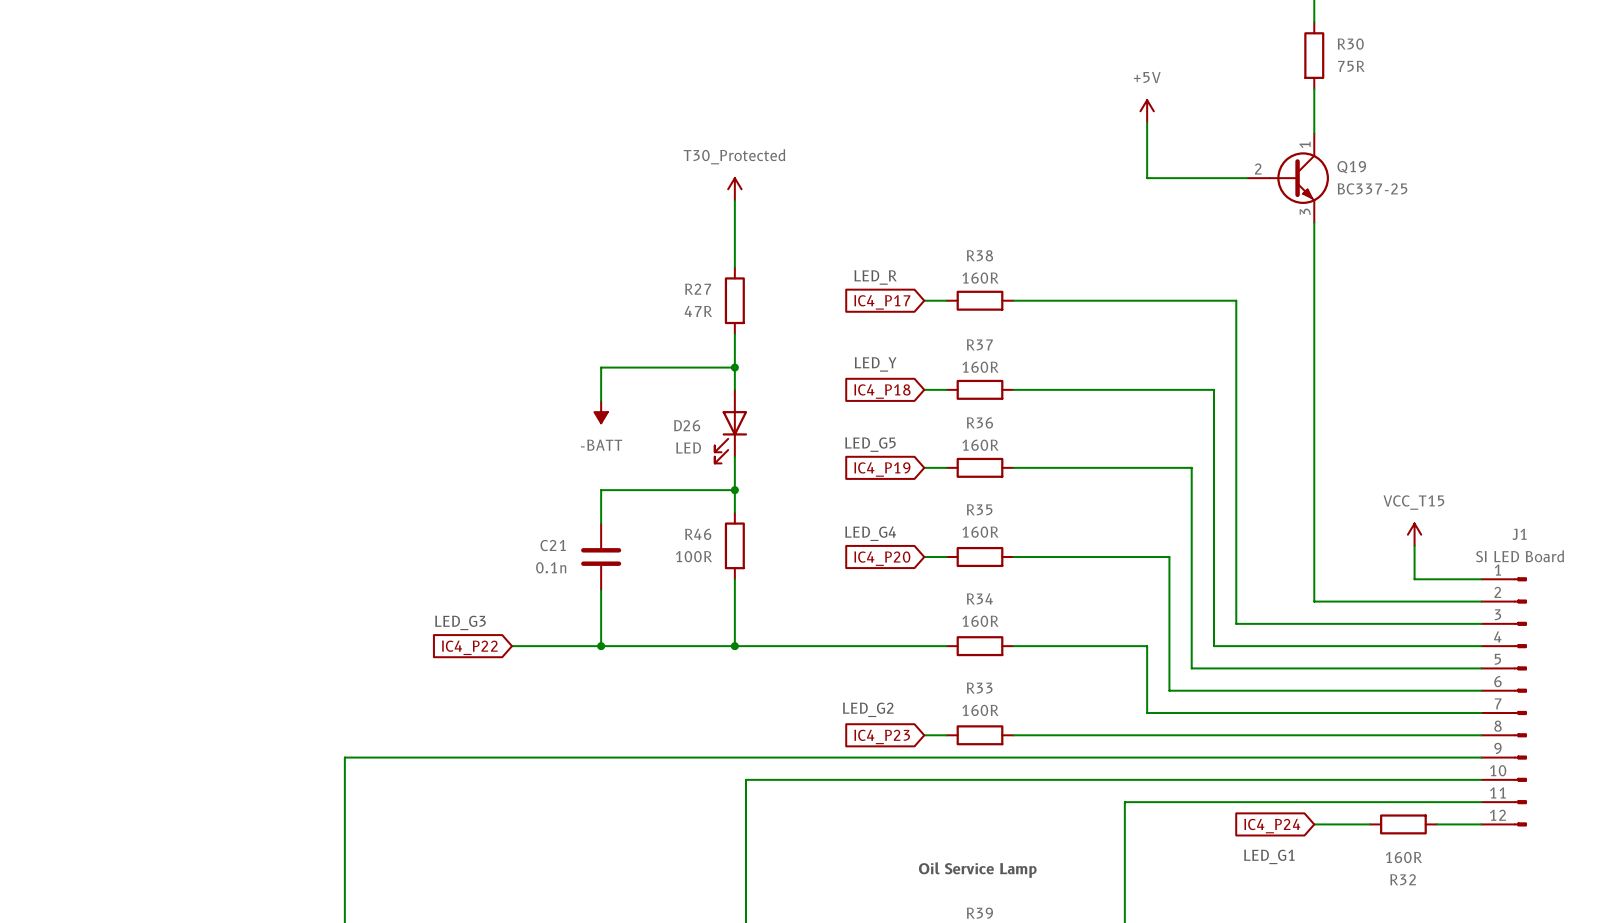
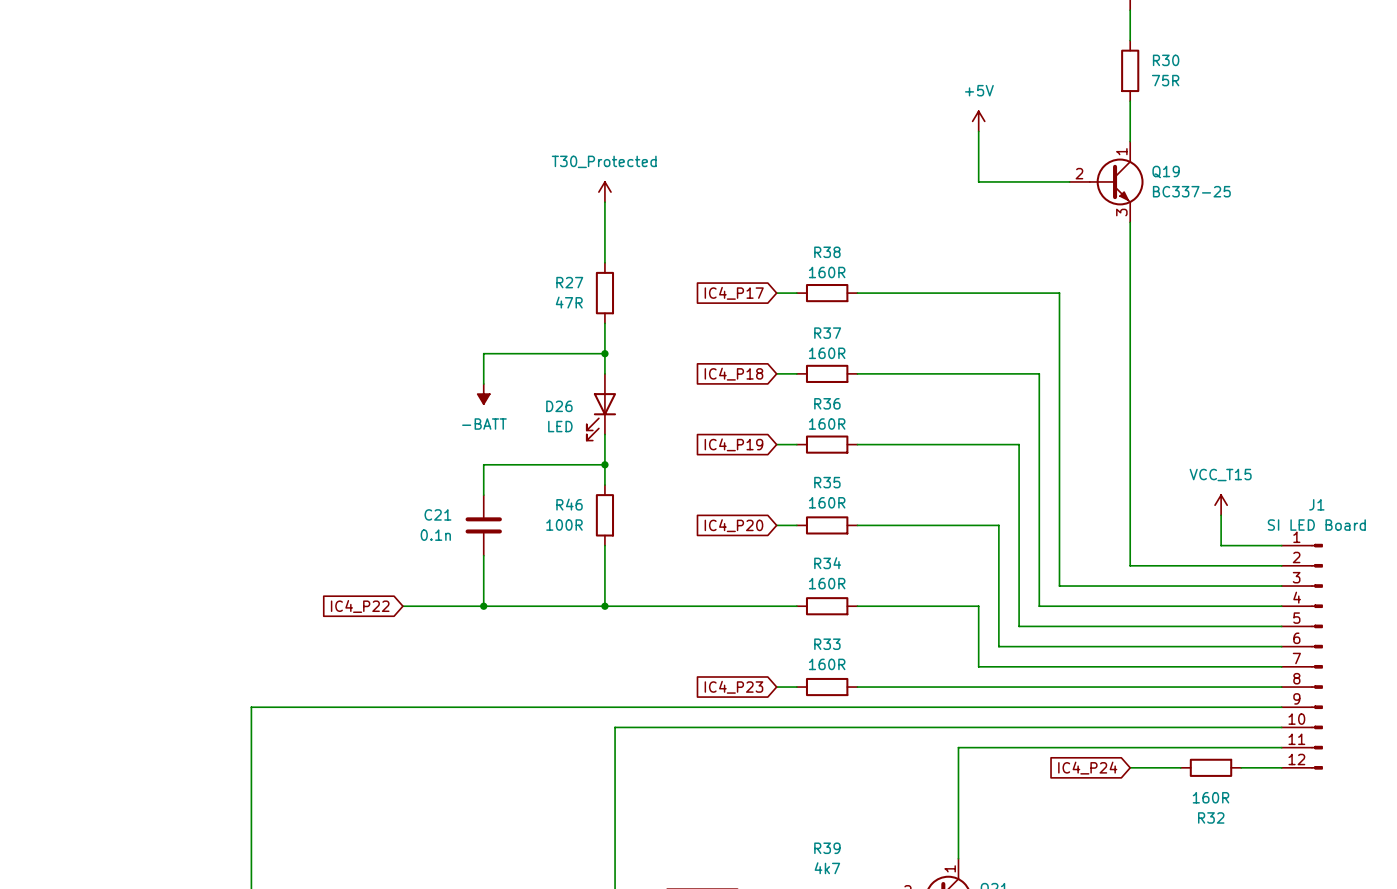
text: LED_R (875, 277) -> none
text: LED_Y (875, 364) -> none
text: LED_G5 (870, 444) -> none
text: LED_G4 (870, 533) -> none
text: LED_G3 (460, 622) -> none
text: LED_G2 (868, 709) -> none
text: LED_G1 (1269, 856) -> none
text: Oil Service Lamp (977, 870) -> none

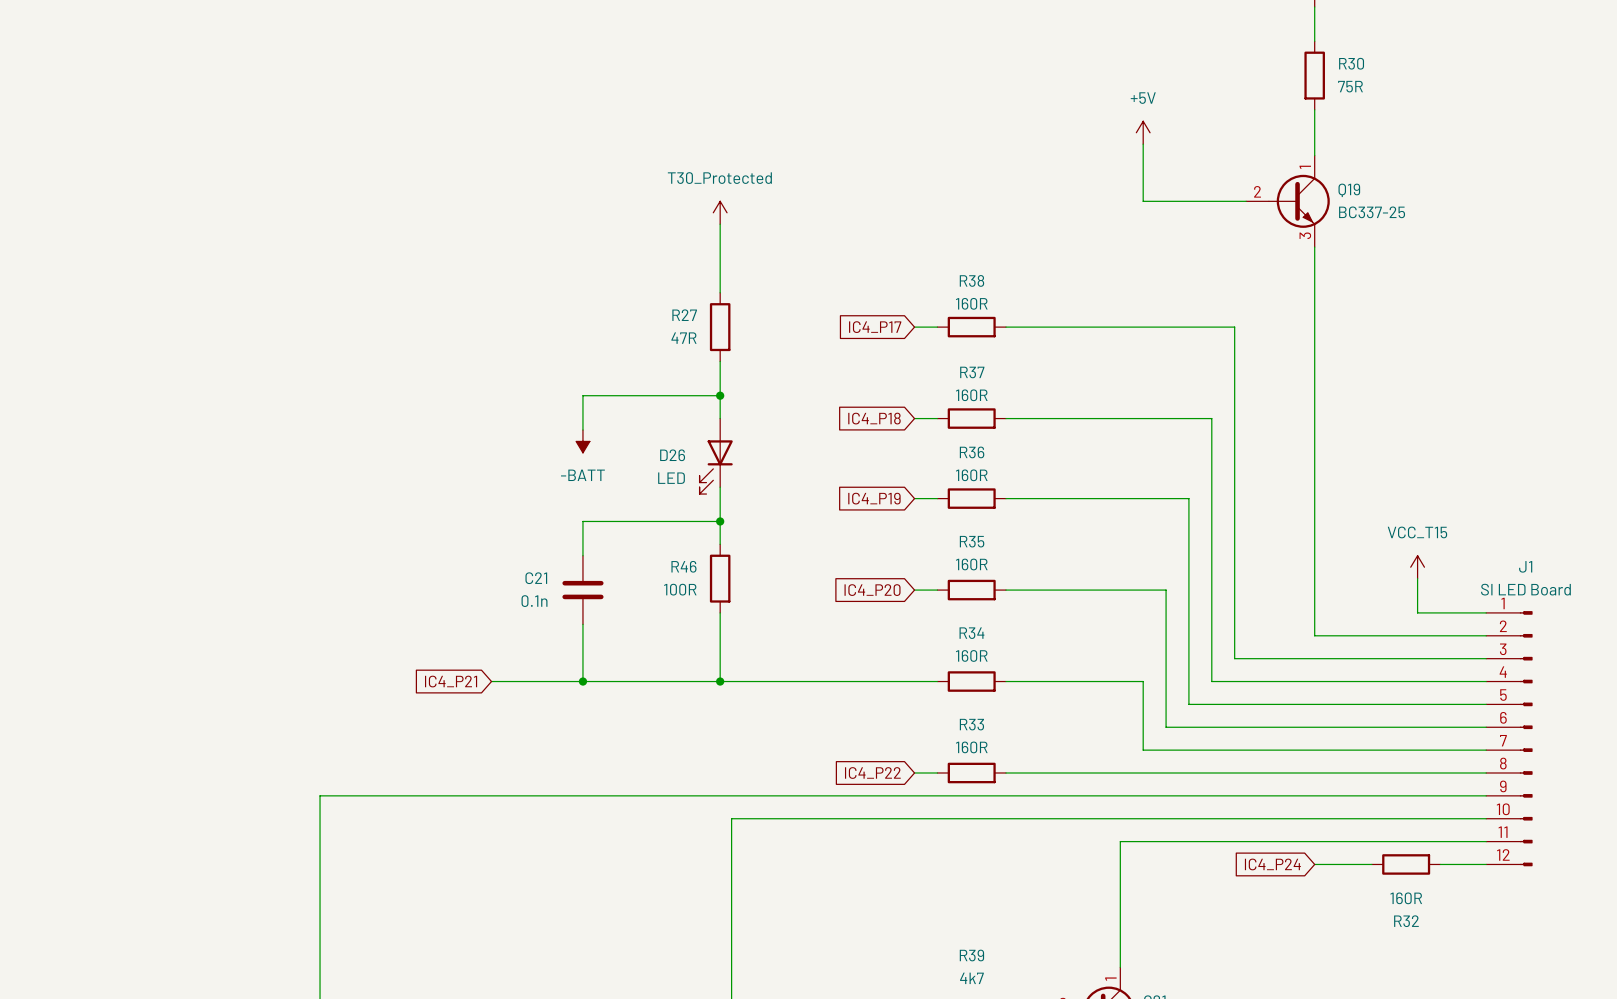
global label: IC4_P22 (360, 606) -> IC4_P21 (451, 681)
global label: IC4_P23 (733, 687) -> IC4_P22 (872, 773)

